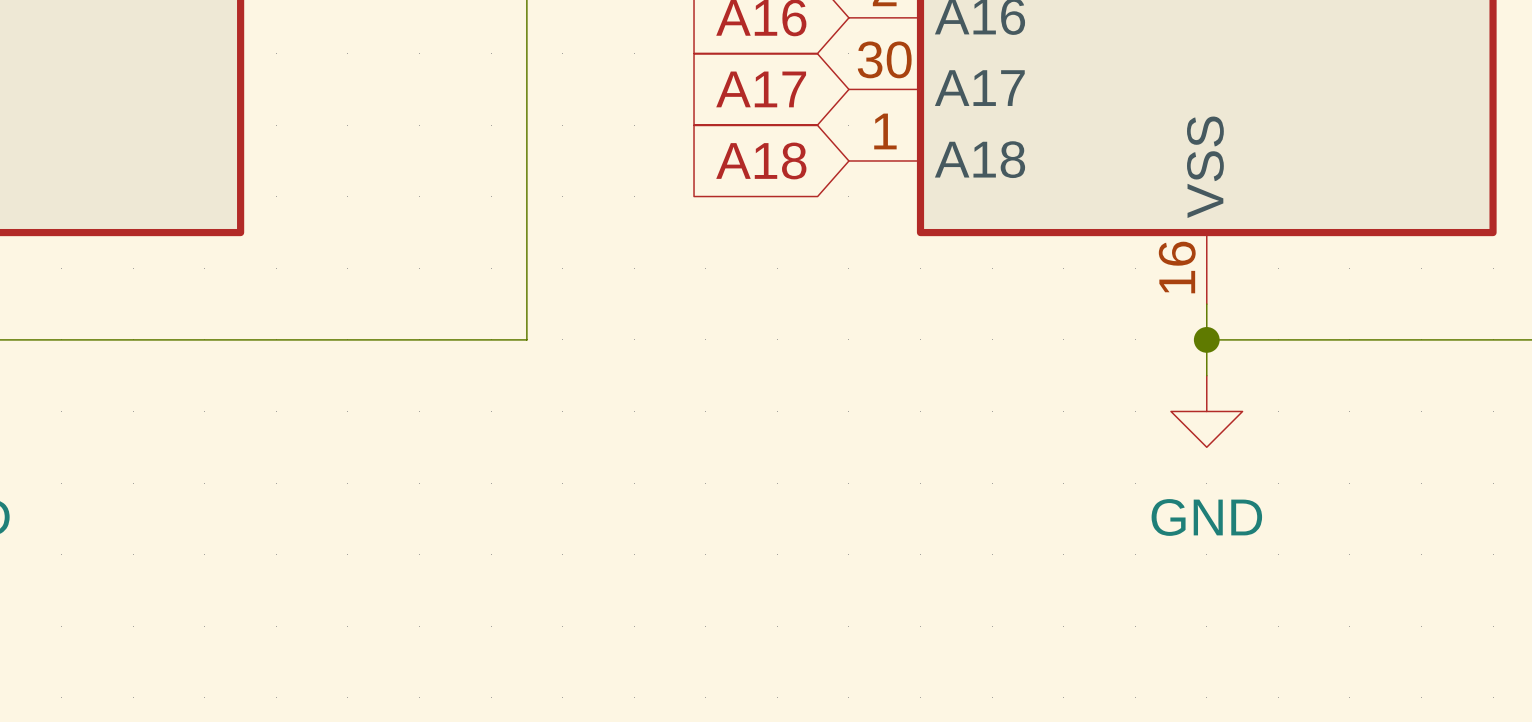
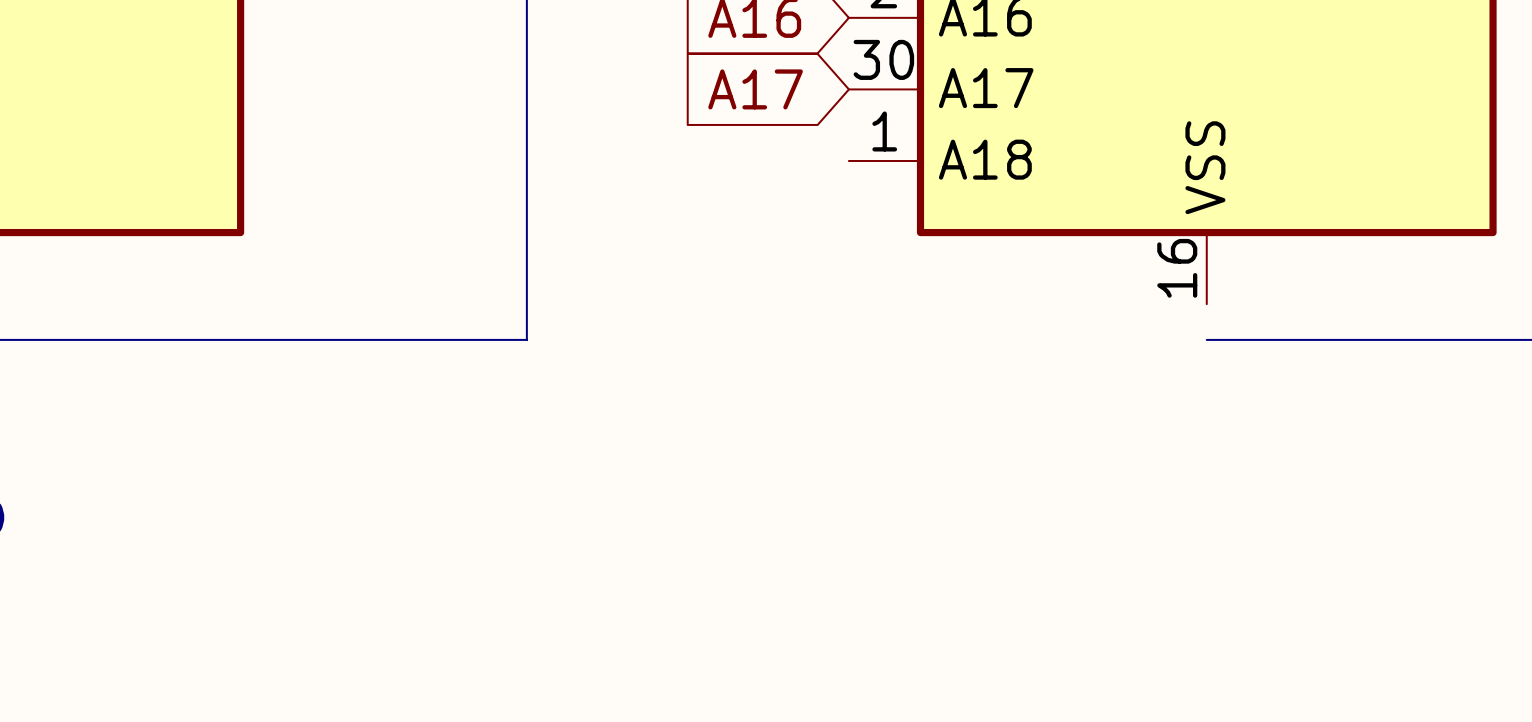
global label: A18 (761, 160) -> none
wire: (1206, 304) (1206, 375) -> none
junction: (1206, 339) -> none
power symbol: GND (1206, 411) -> none

